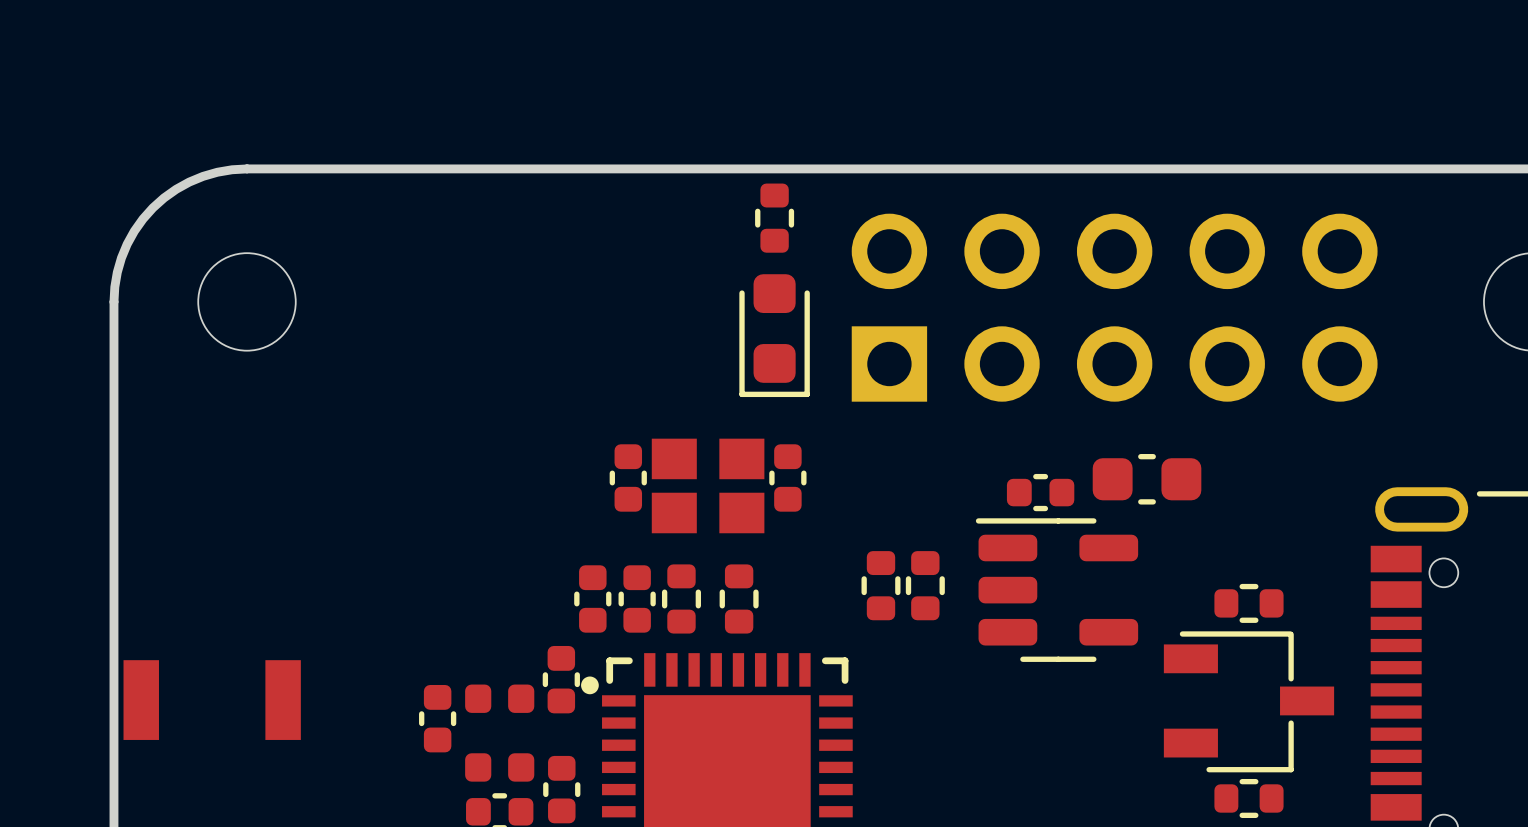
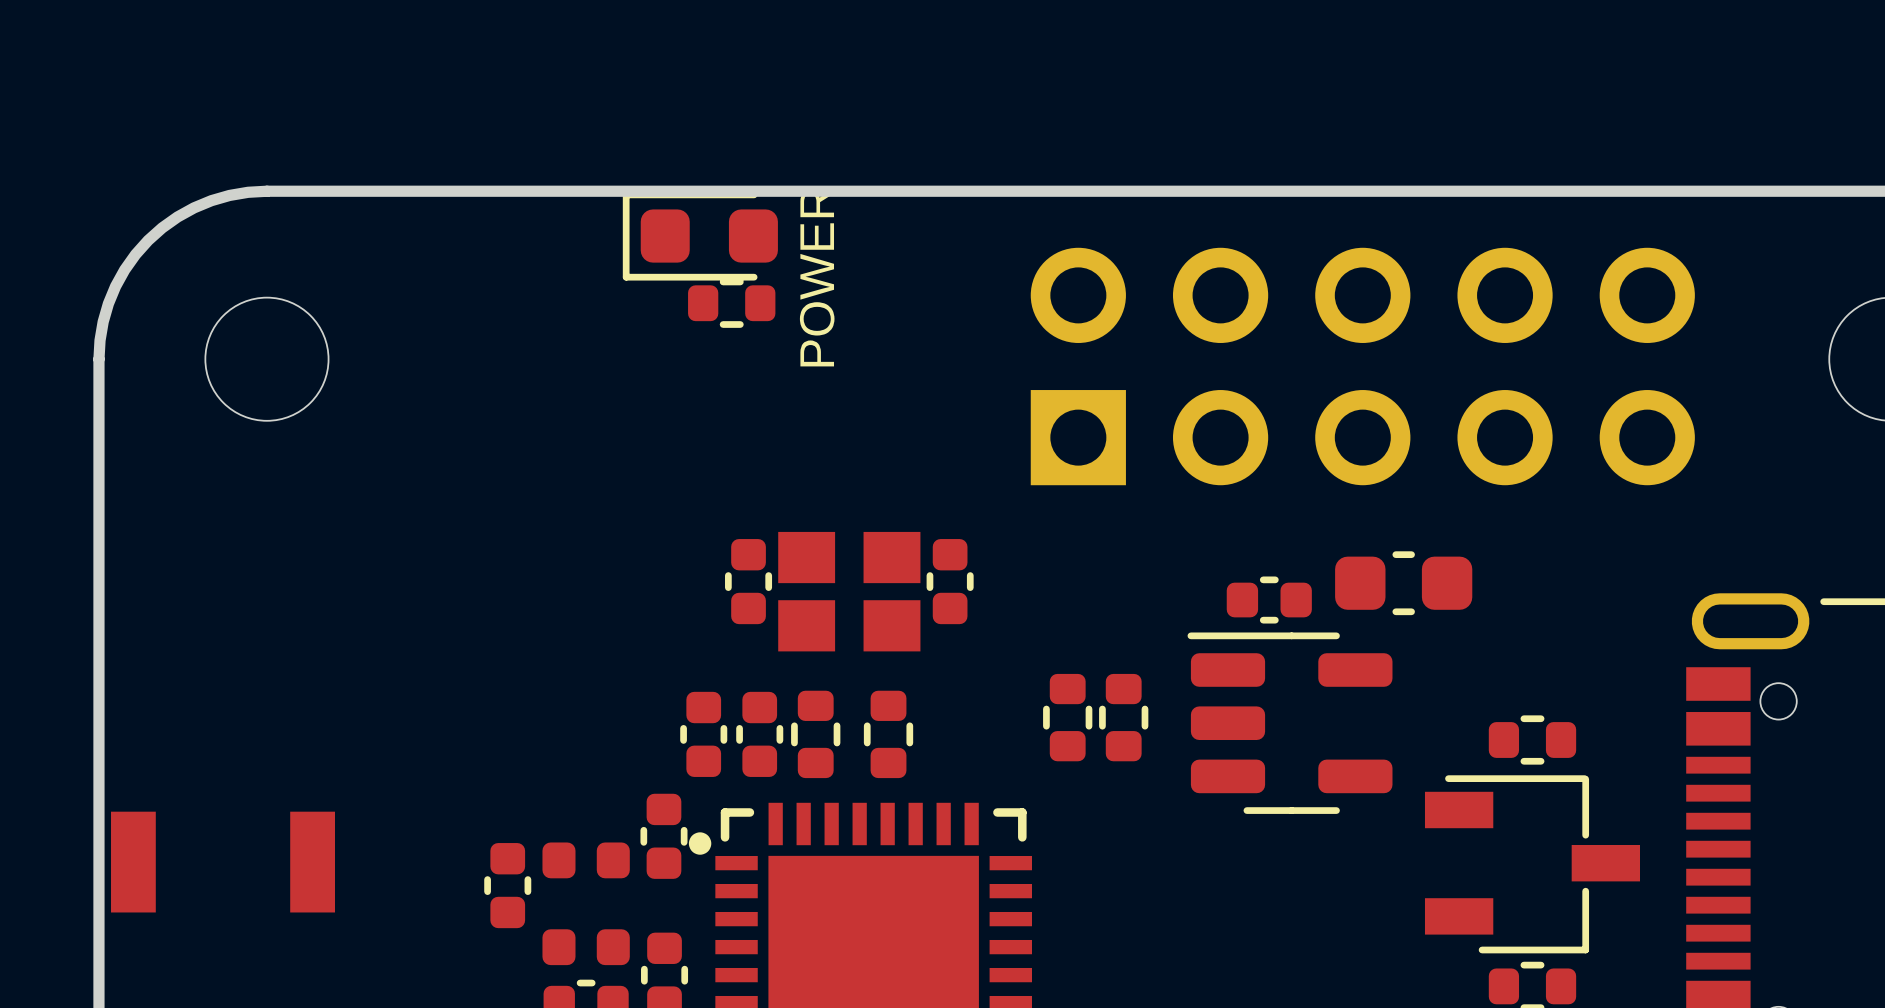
part rotation: 0° (774, 218) -> 90° clockwise (731, 303)
part position: (774, 218) -> (731, 303)
text: none -> POWER (817, 277)
part rotation: 0° (774, 335) -> 90° clockwise (700, 236)
part position: (774, 335) -> (700, 236)

